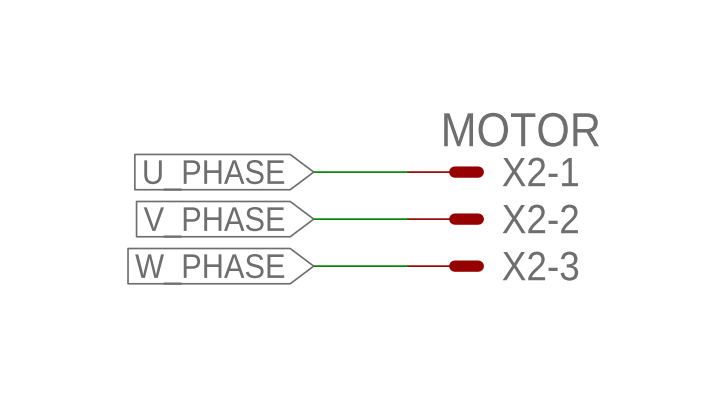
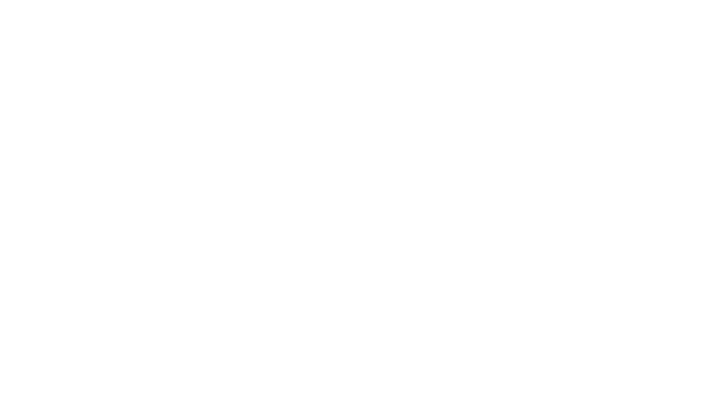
wire: (313, 172) (407, 172) -> none
X2-1: MOTOR (445, 172) -> none
global label: U_PHASE (214, 175) -> none
wire: (313, 219) (407, 219) -> none
X2-2: (445, 219) -> none
global label: V_PHASE (213, 222) -> none
wire: (313, 266) (407, 266) -> none
X2-3: (445, 266) -> none
global label: W_PHASE (209, 269) -> none

